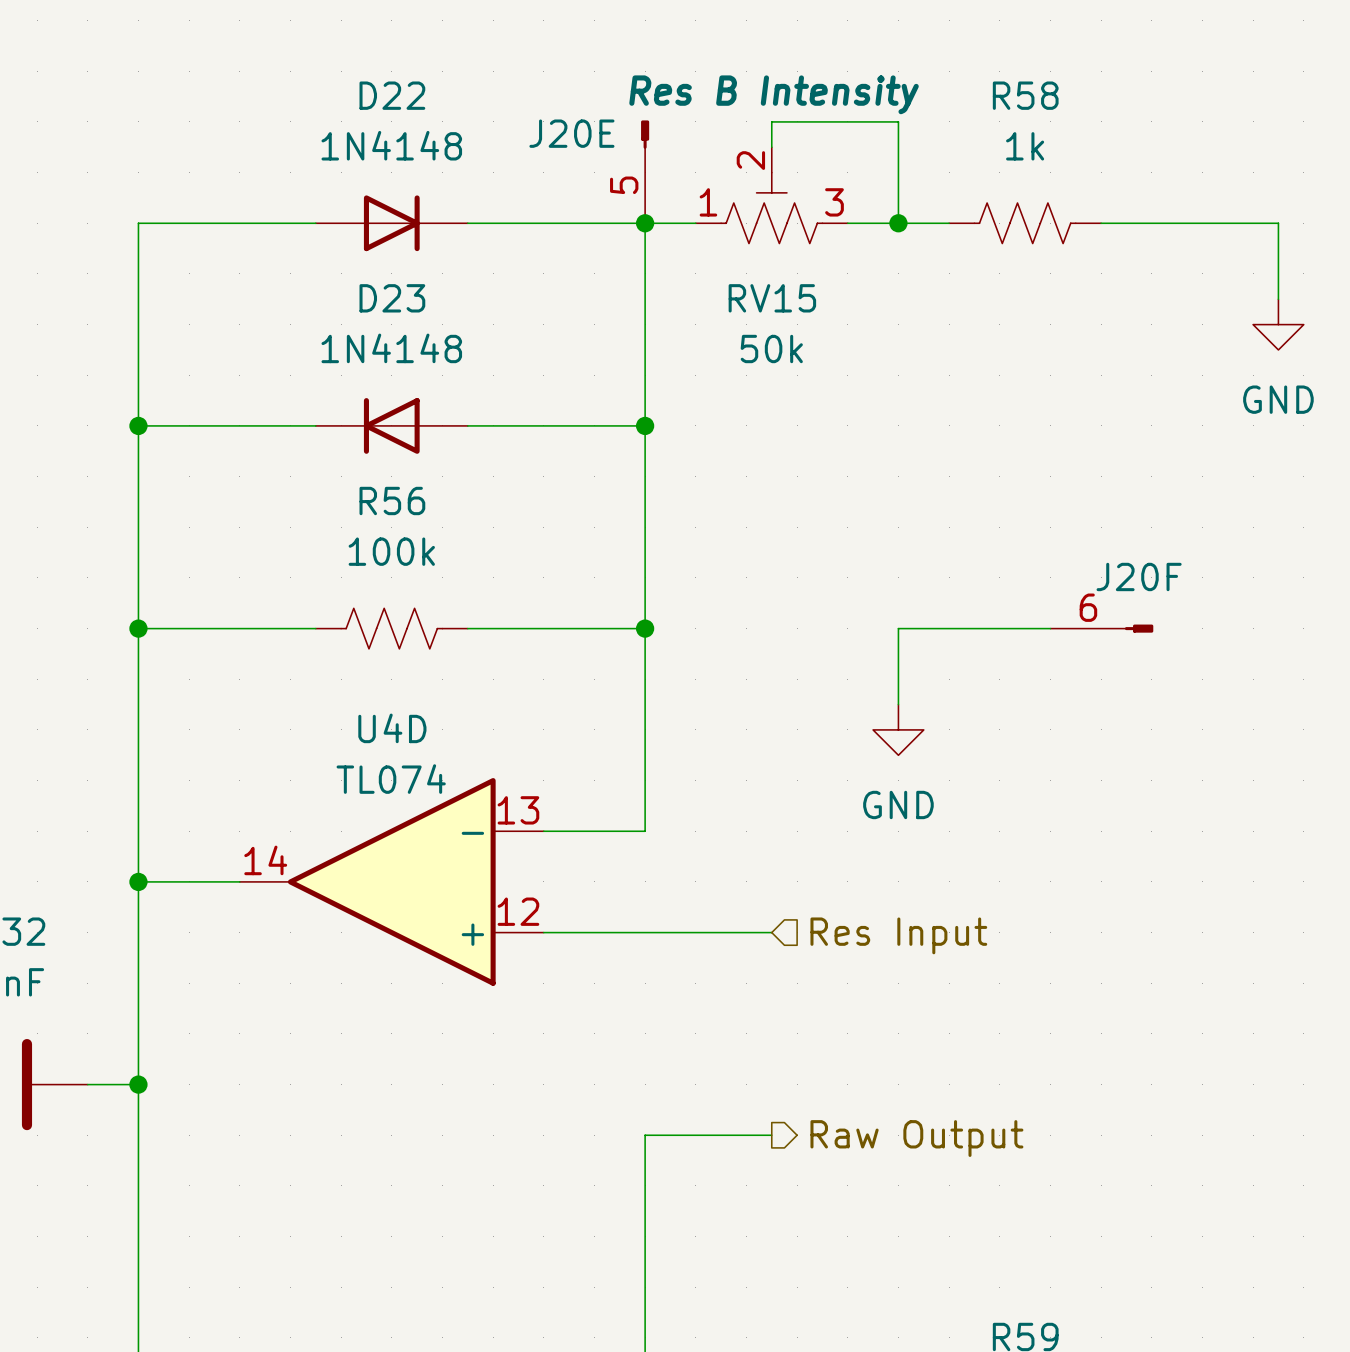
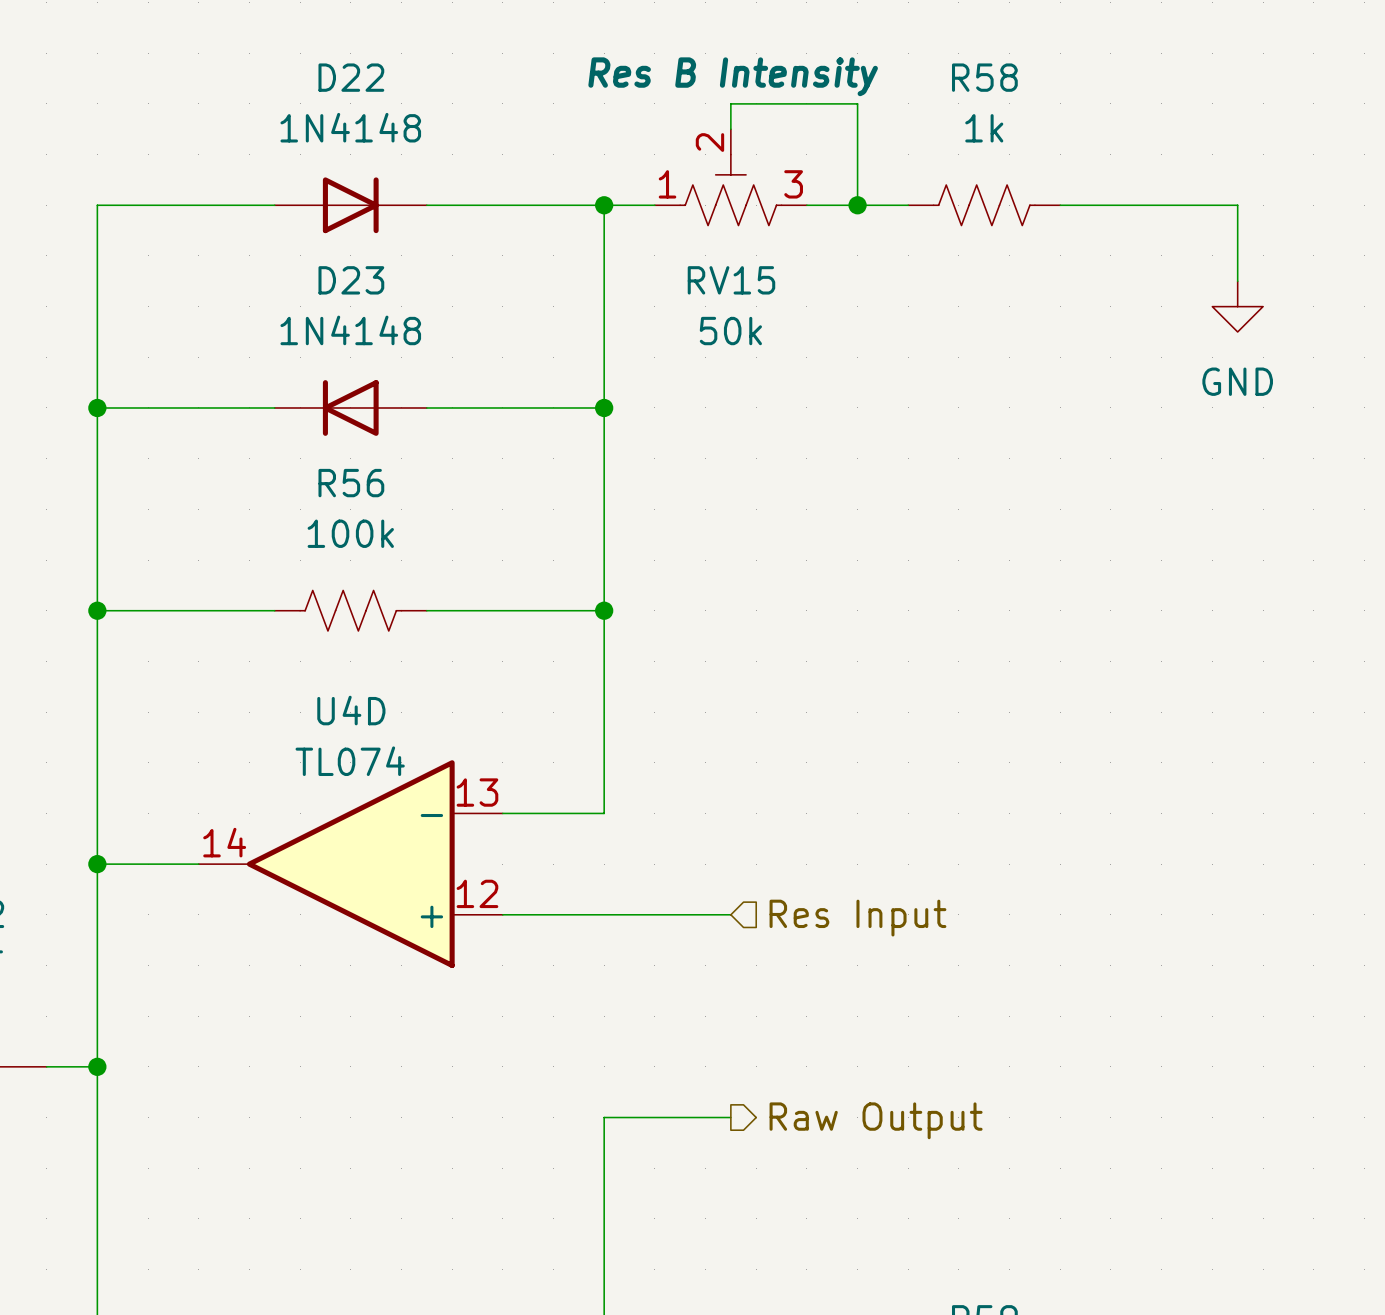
J20E: (645, 171) -> none
wire: (1050, 628) (898, 628) (898, 704) -> none
J20F: (1101, 628) -> none
power symbol: GND (898, 729) -> none

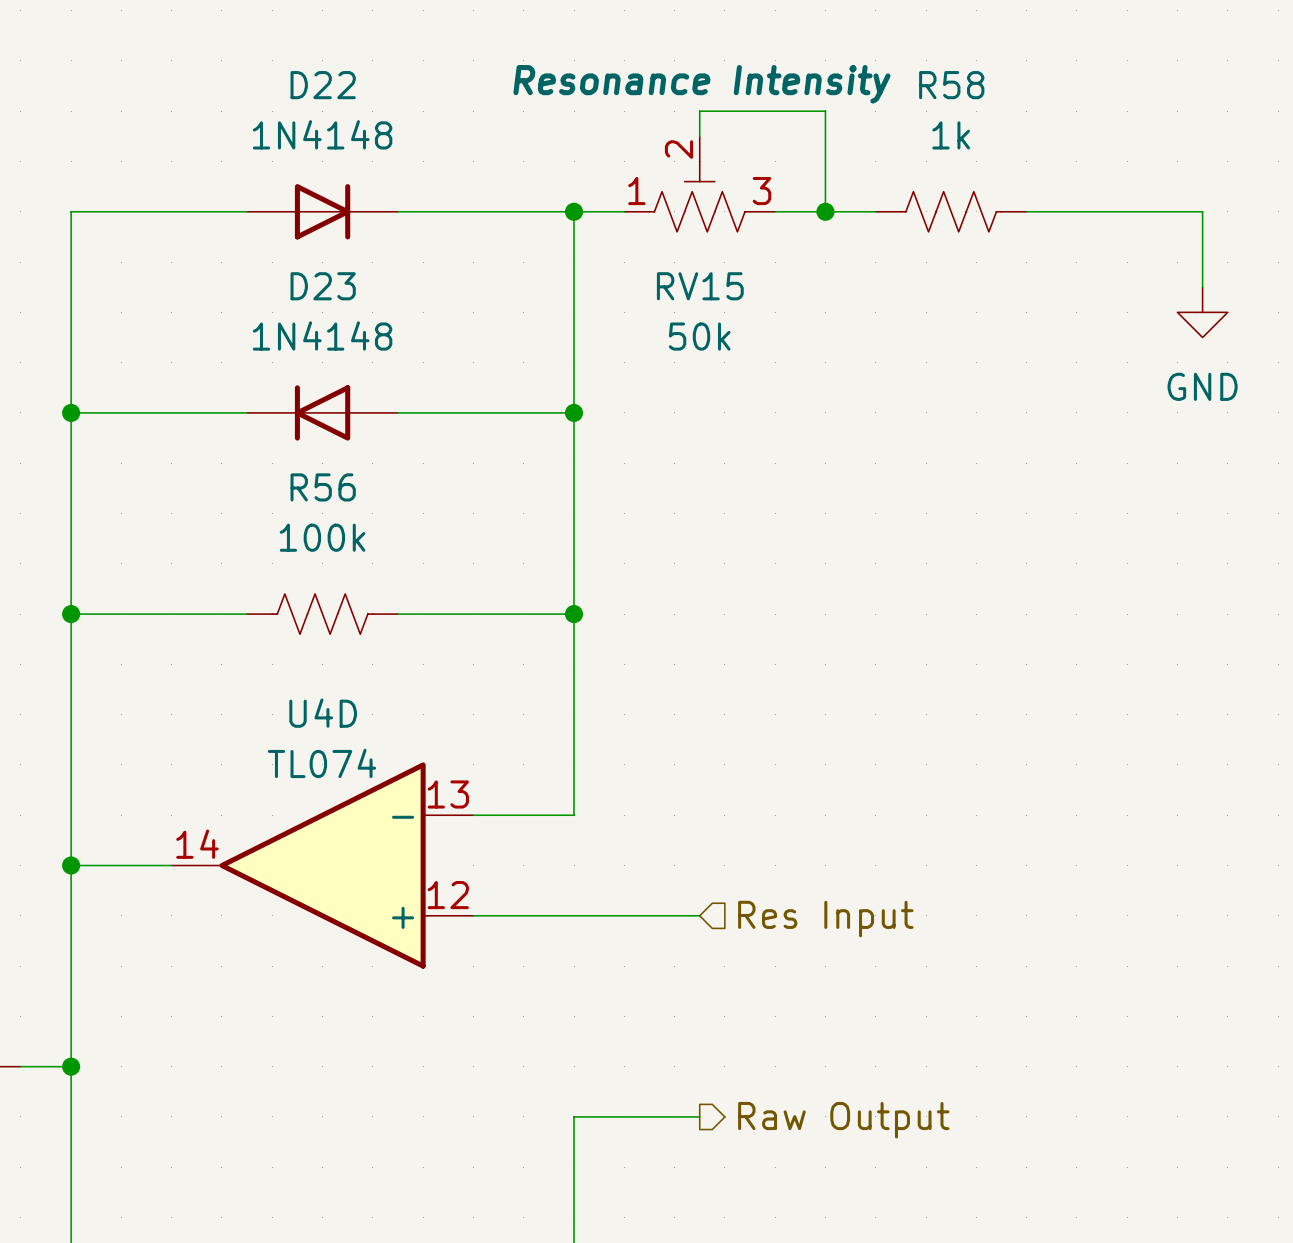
RV15 text: Res B Intensity (733, 76) -> Resonance Intensity (701, 84)

